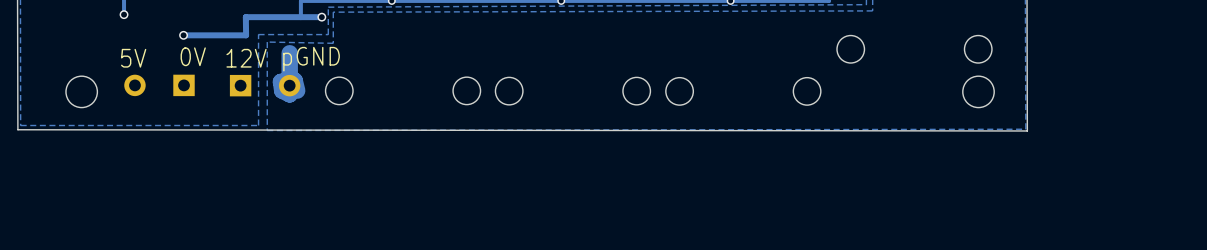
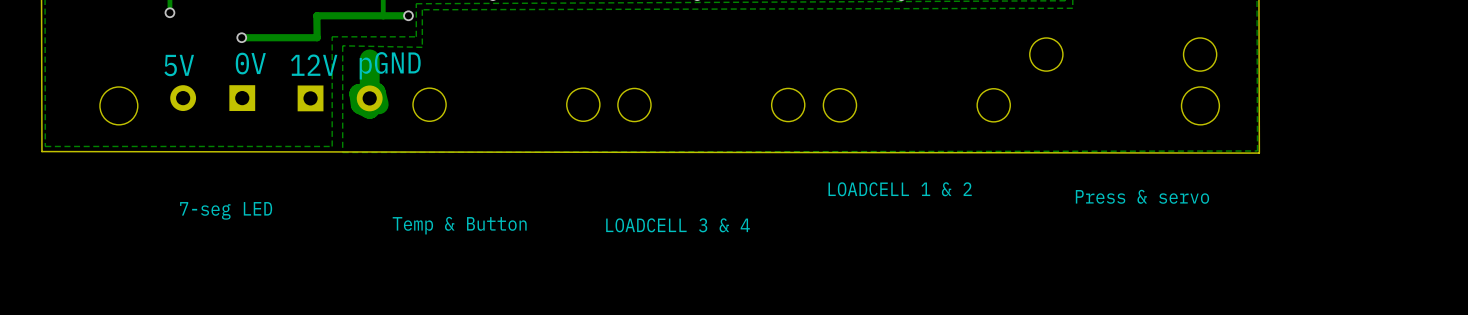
text: none -> LOADCELL 1 & 2 (900, 189)
text: none -> Press & servo (1142, 196)
text: none -> 7-seg LED (226, 210)
text: none -> LOADCELL 3 & 4 (678, 225)
text: none -> Temp & Button (459, 225)

